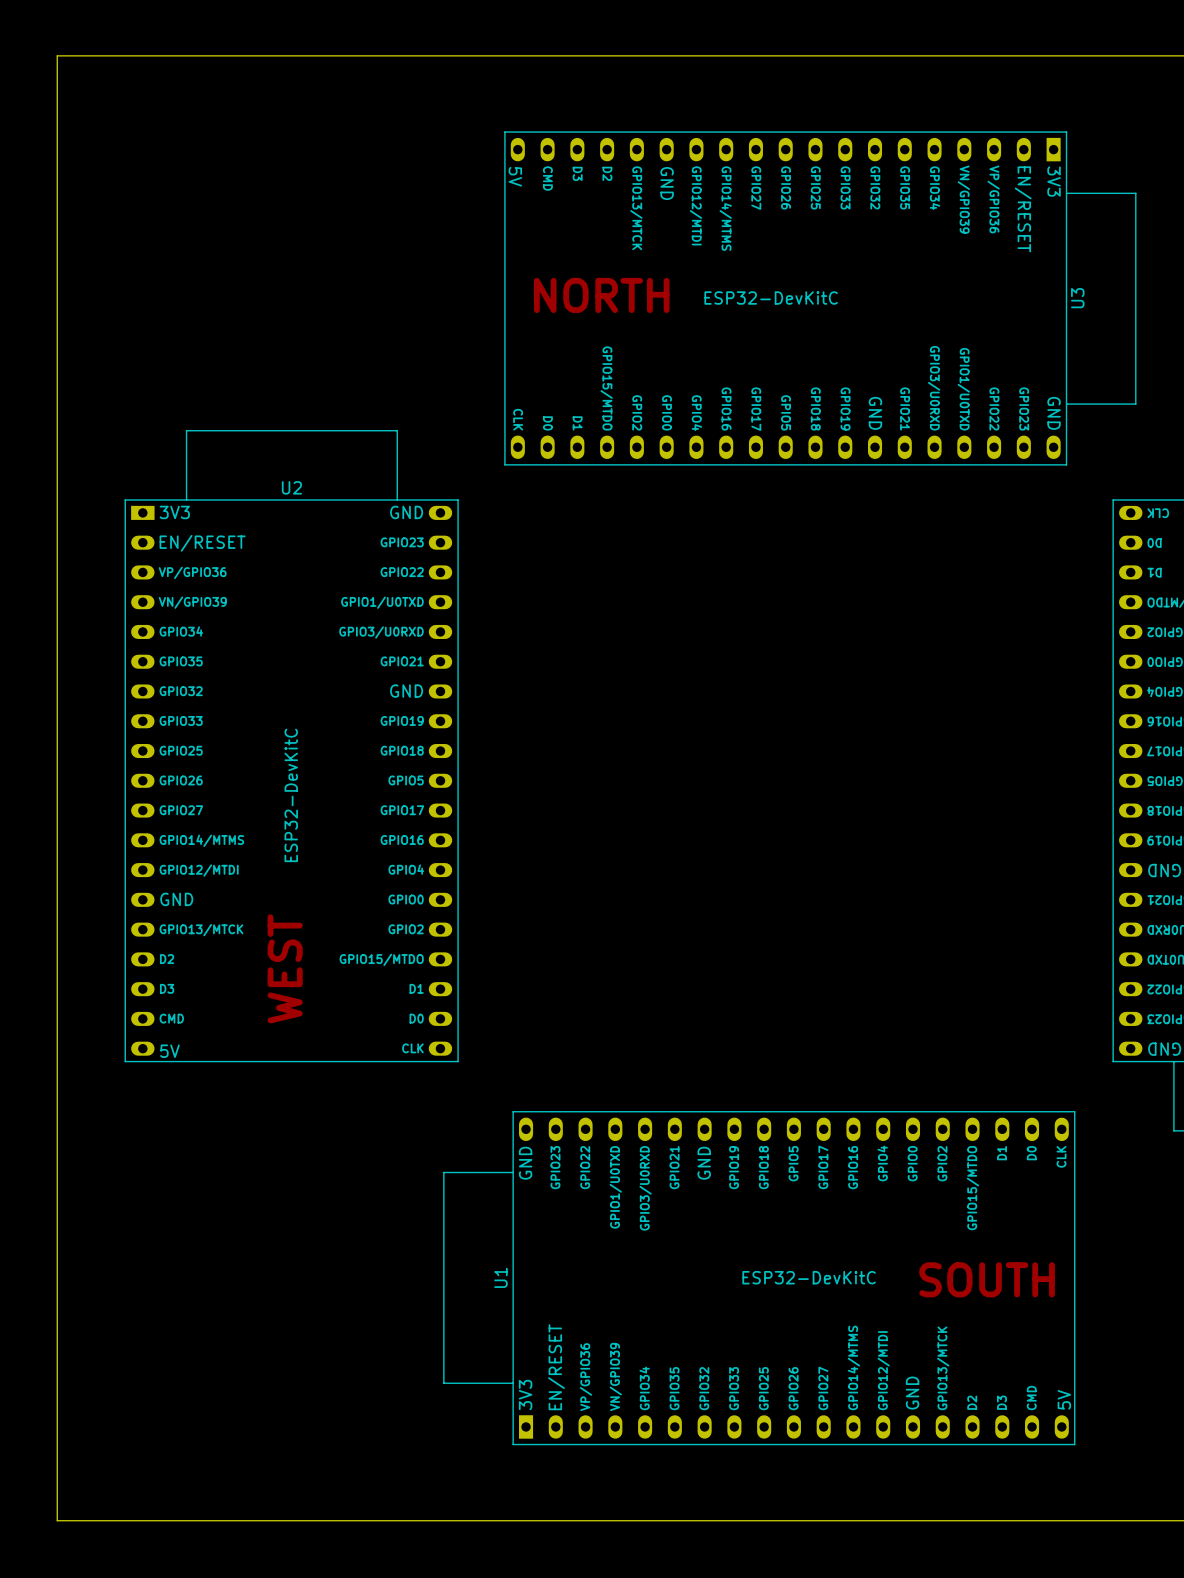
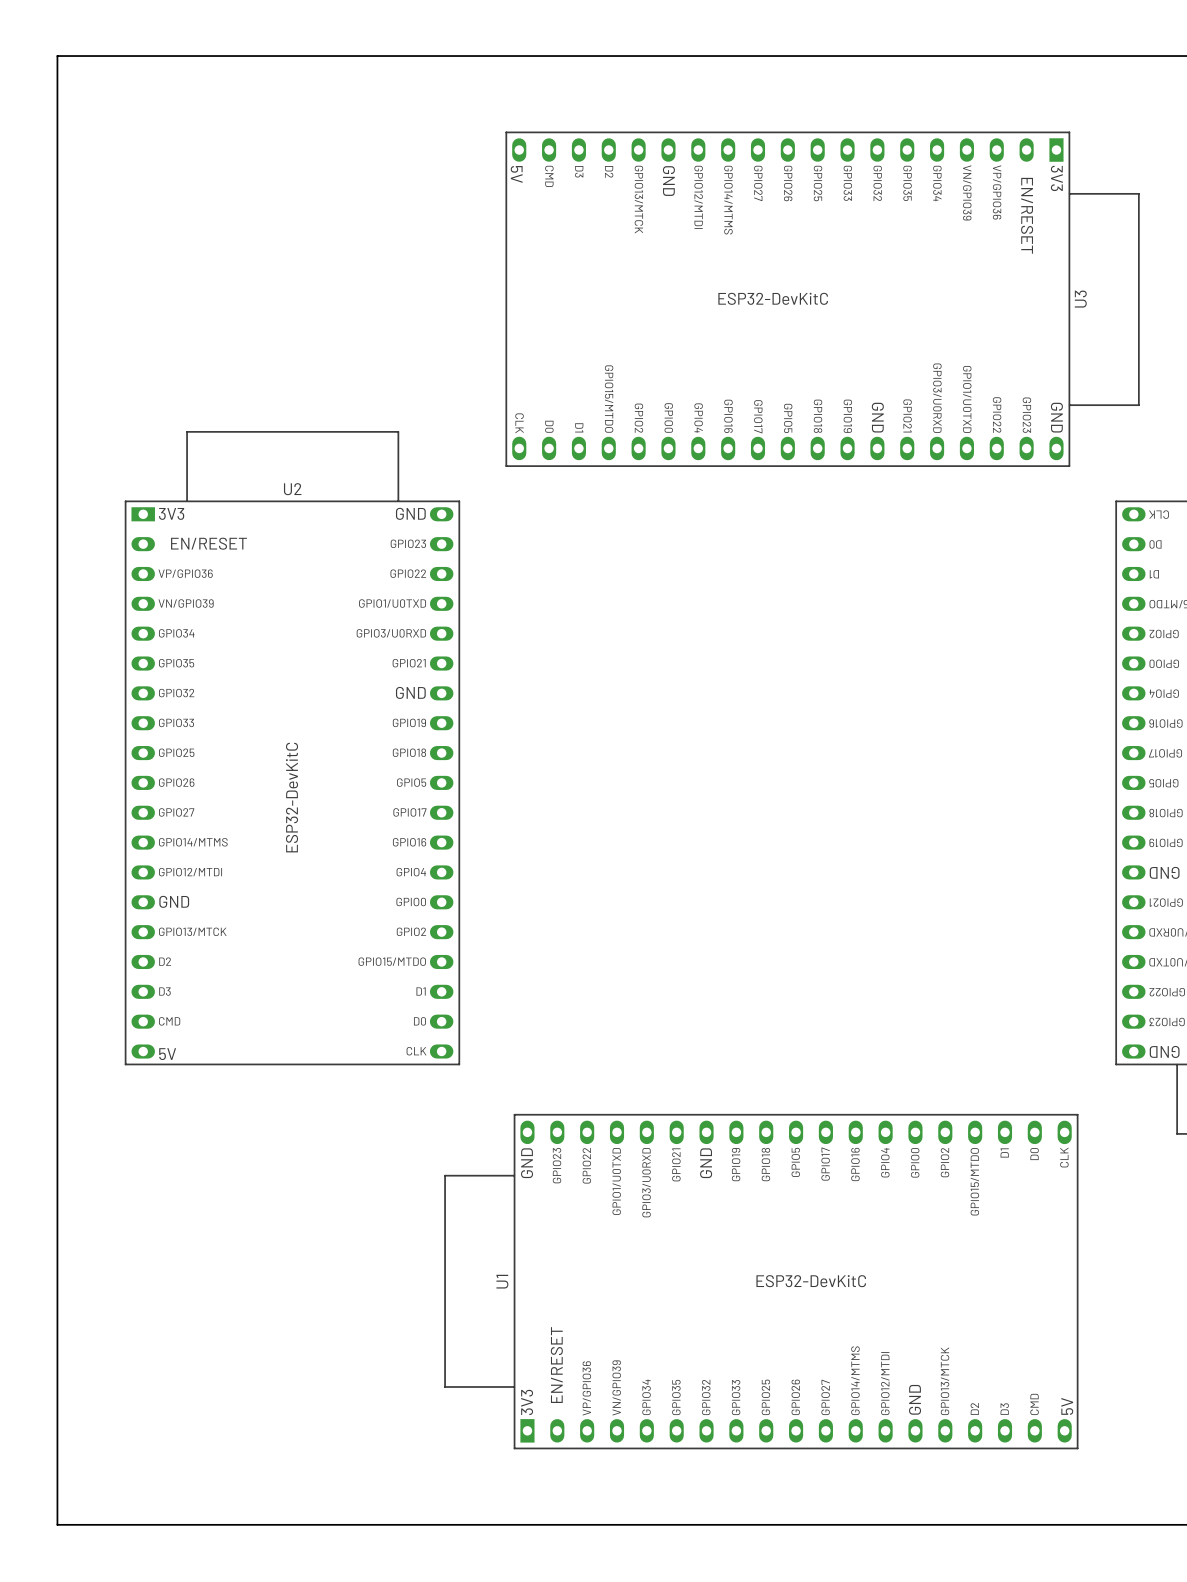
text: NORTH (601, 295) -> none
text: WEST (285, 968) -> none
text: SOUTH (987, 1279) -> none

